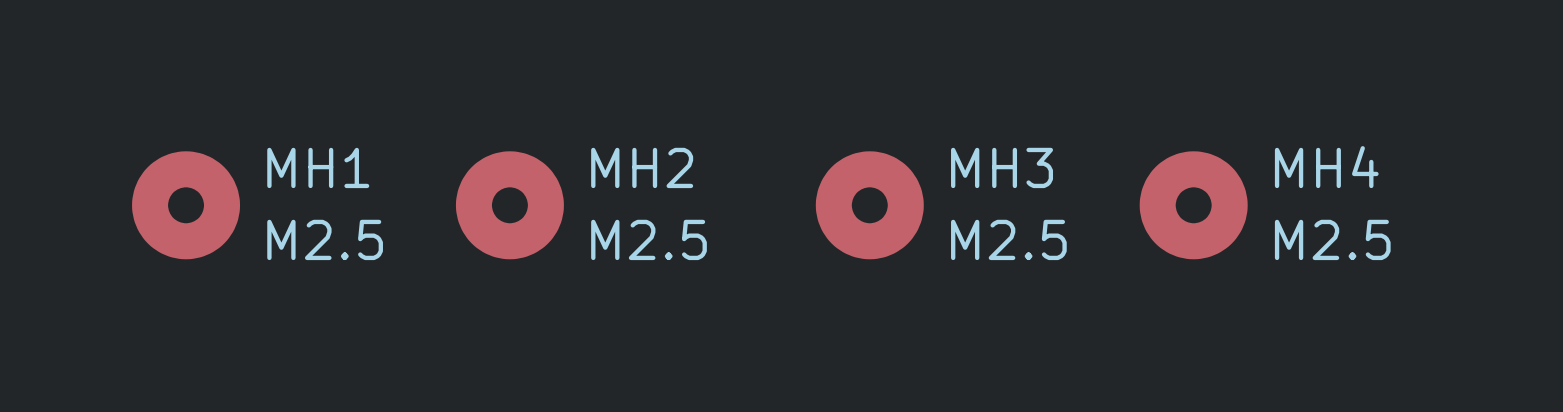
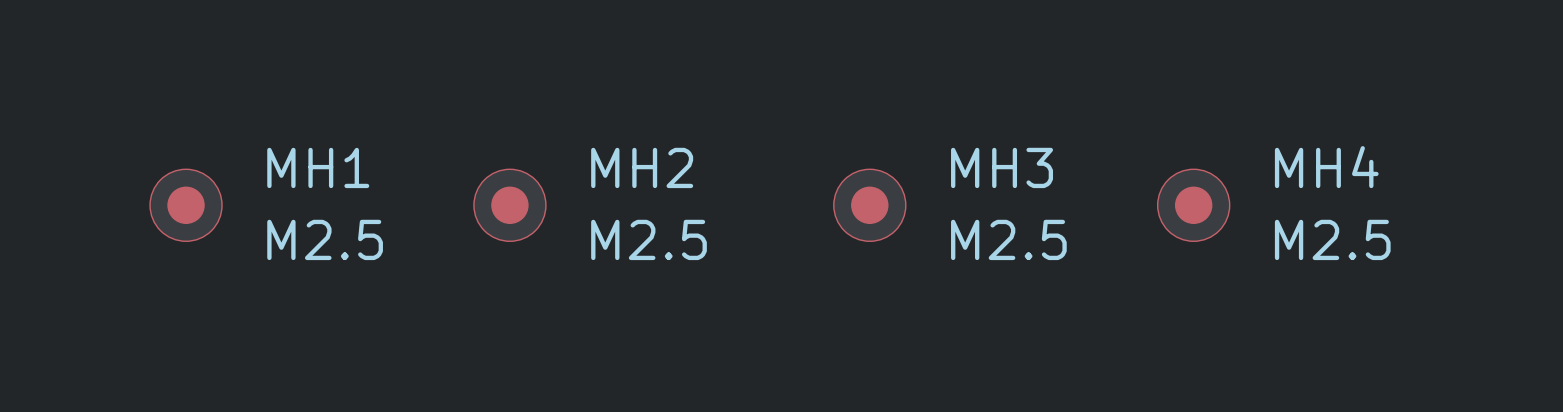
MH1 symbol: [132, 151, 241, 260] -> [150, 169, 223, 242]
MH2 symbol: [455, 151, 564, 260] -> [473, 169, 546, 242]
MH3 symbol: [815, 151, 924, 260] -> [833, 169, 906, 242]
MH4 symbol: [1139, 151, 1248, 260] -> [1157, 169, 1230, 242]

